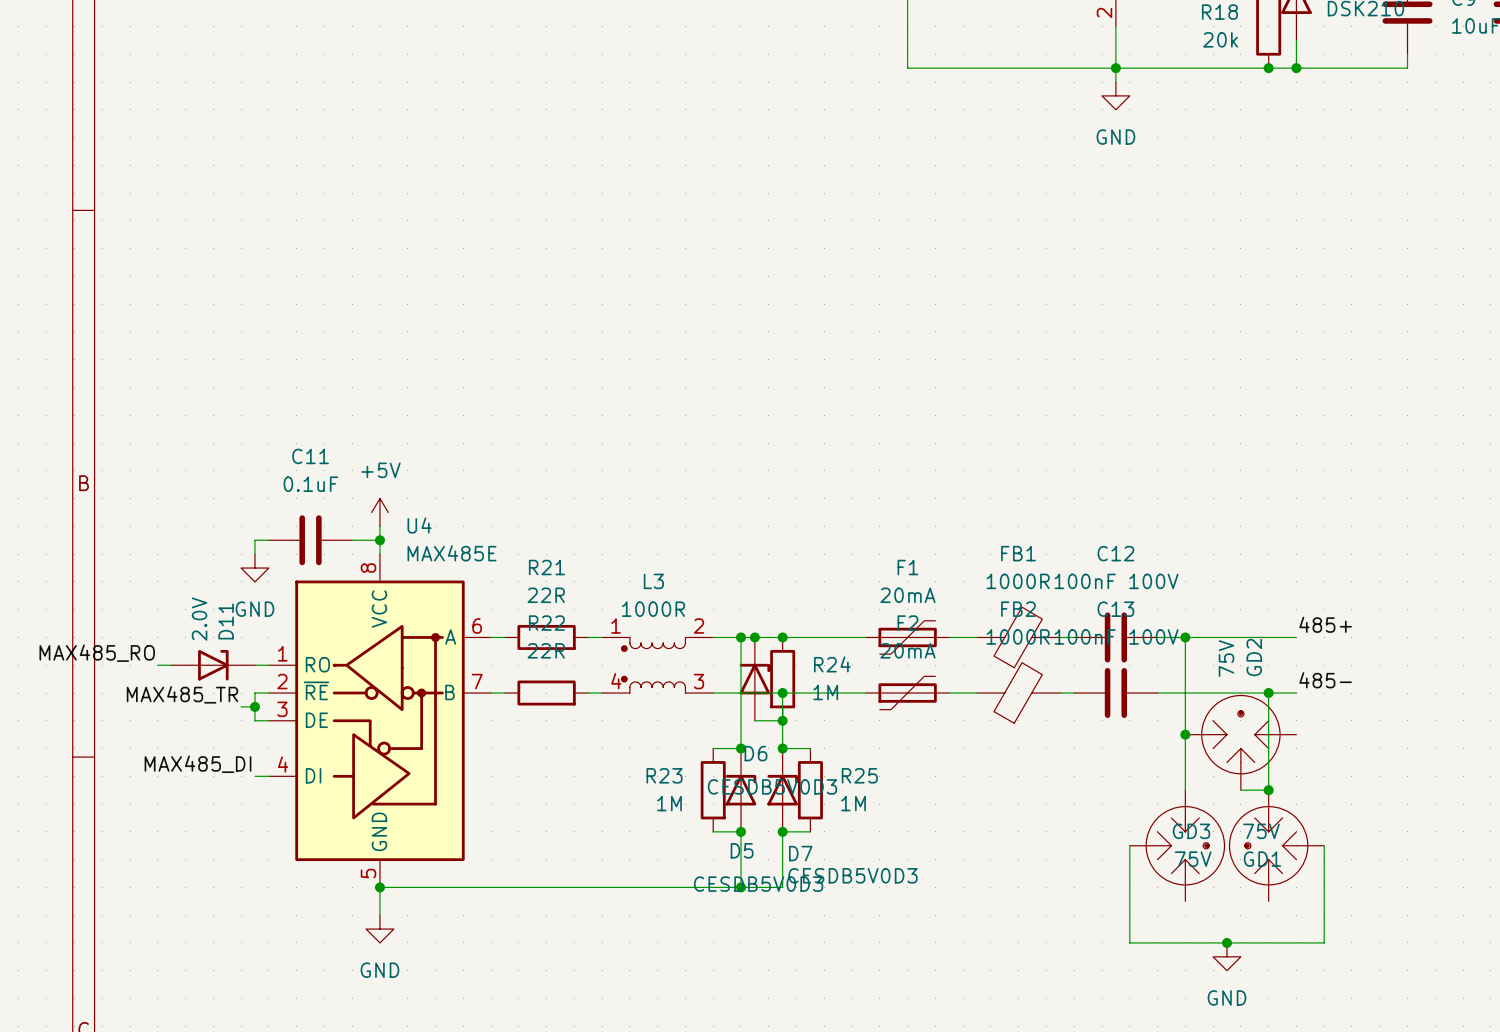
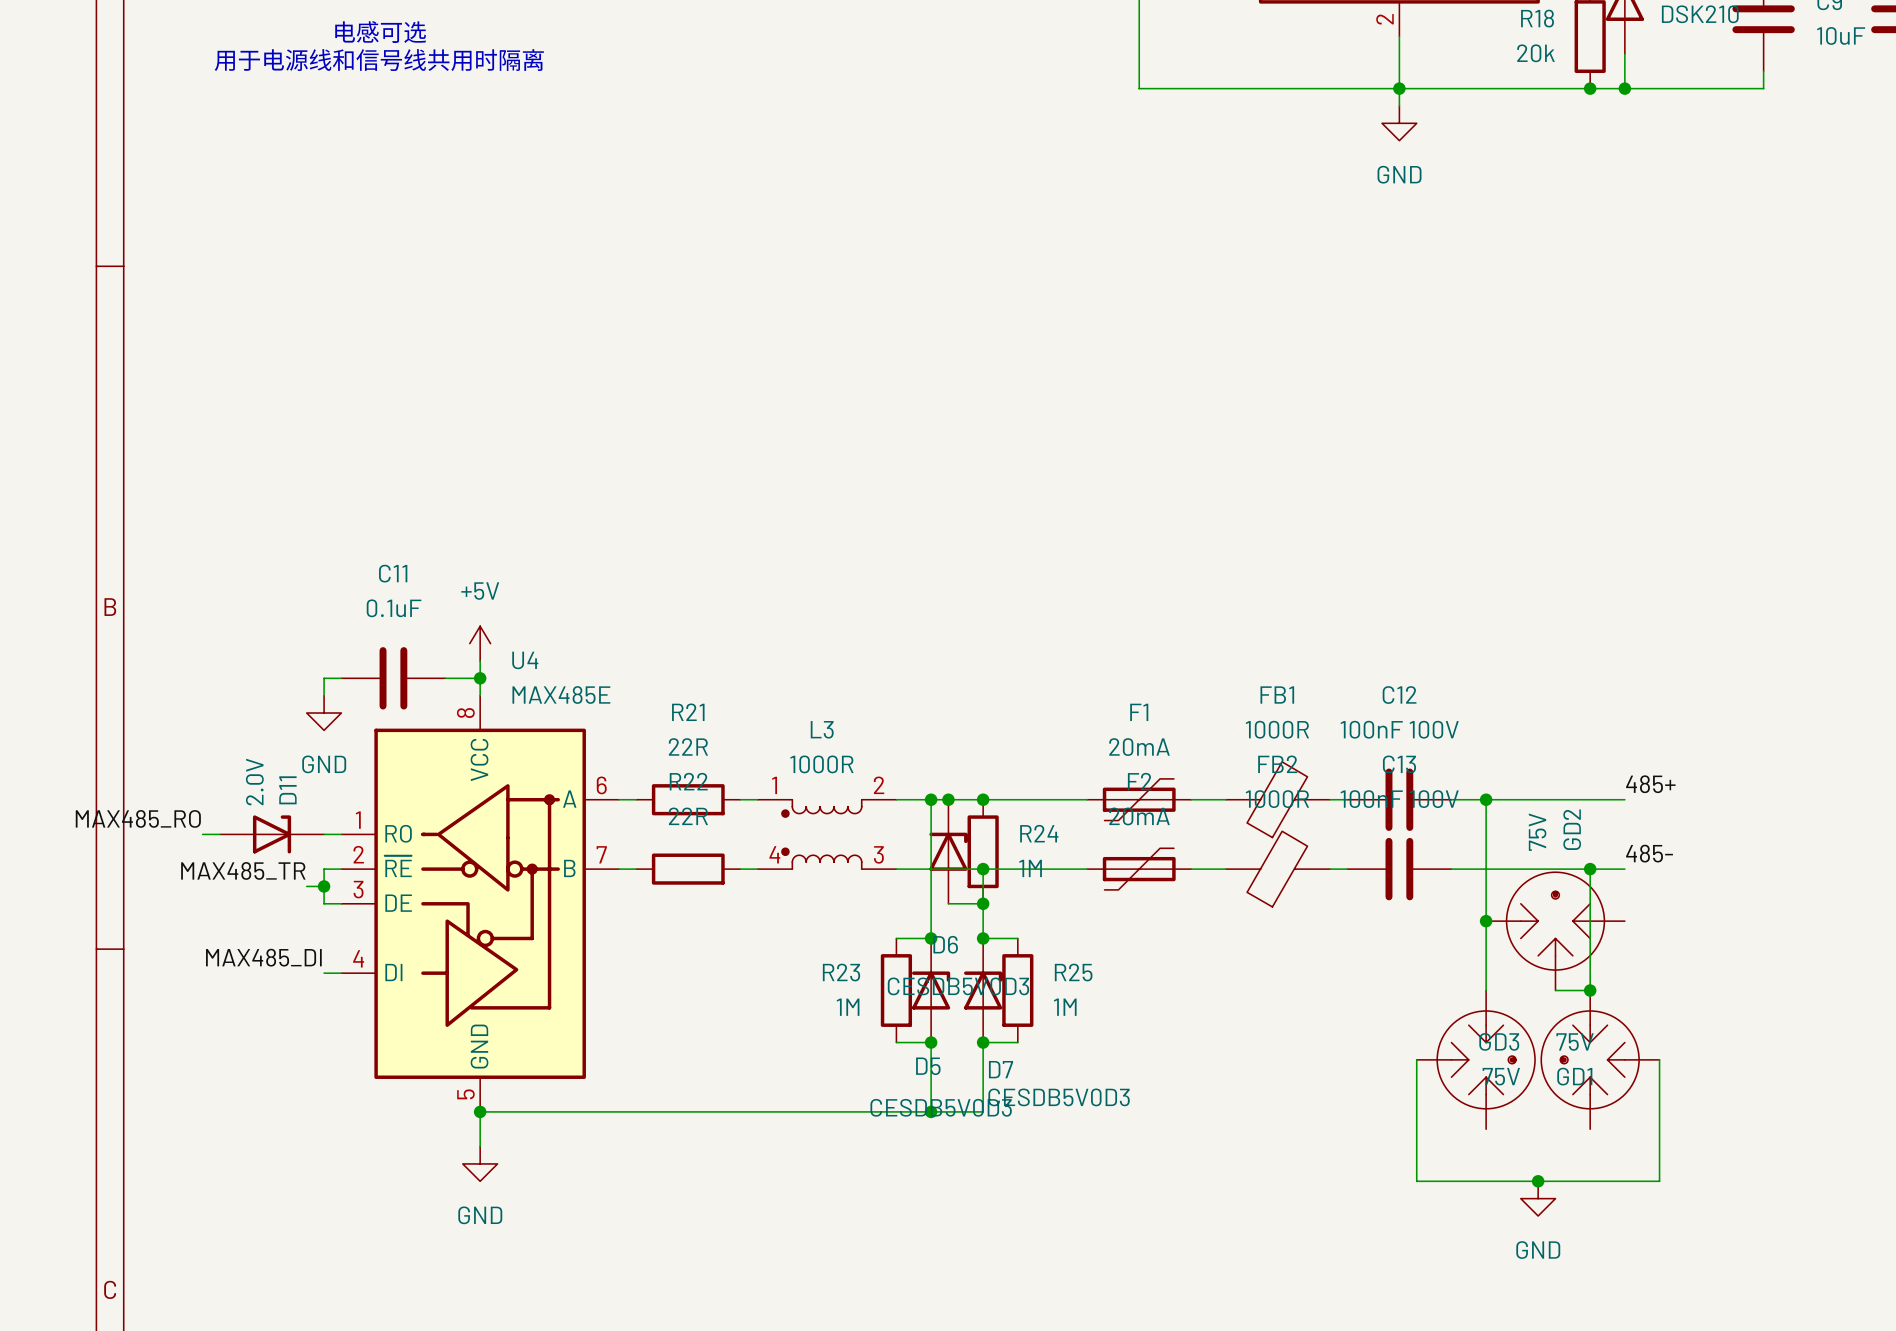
text: none -> 电感可选 (380, 32)
text: none -> 用于电源线和信号线共用时隔离 (379, 60)

